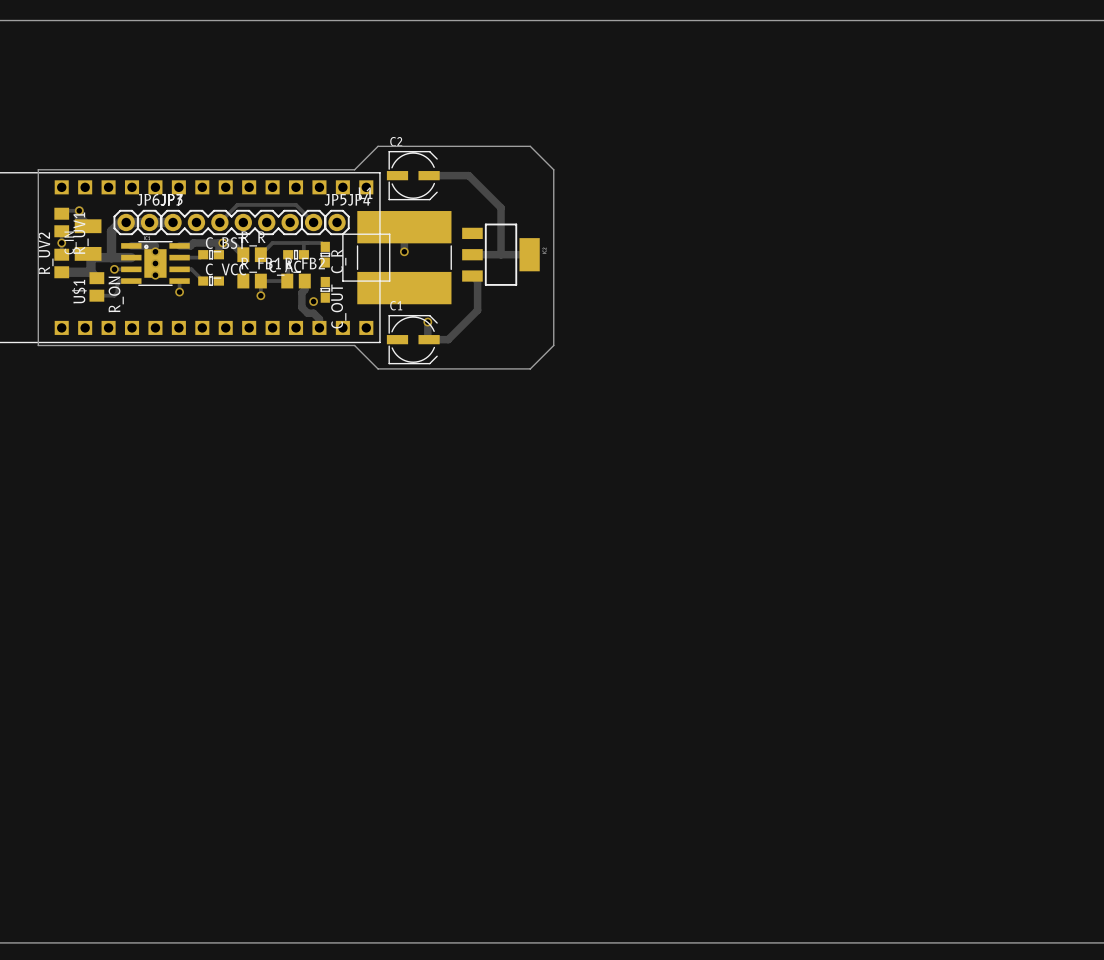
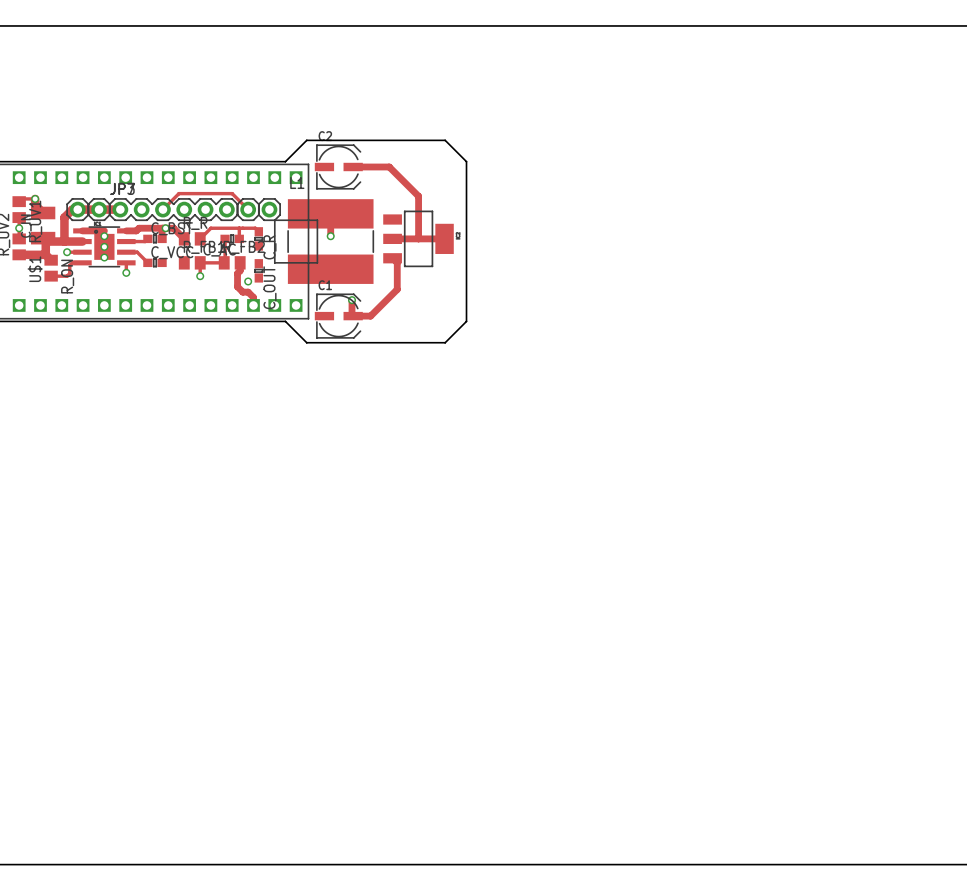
JP6 name: JP6 (148, 199) -> none
JP5 name: JP5 (335, 199) -> none
JP4 name: JP4 (359, 199) -> none

